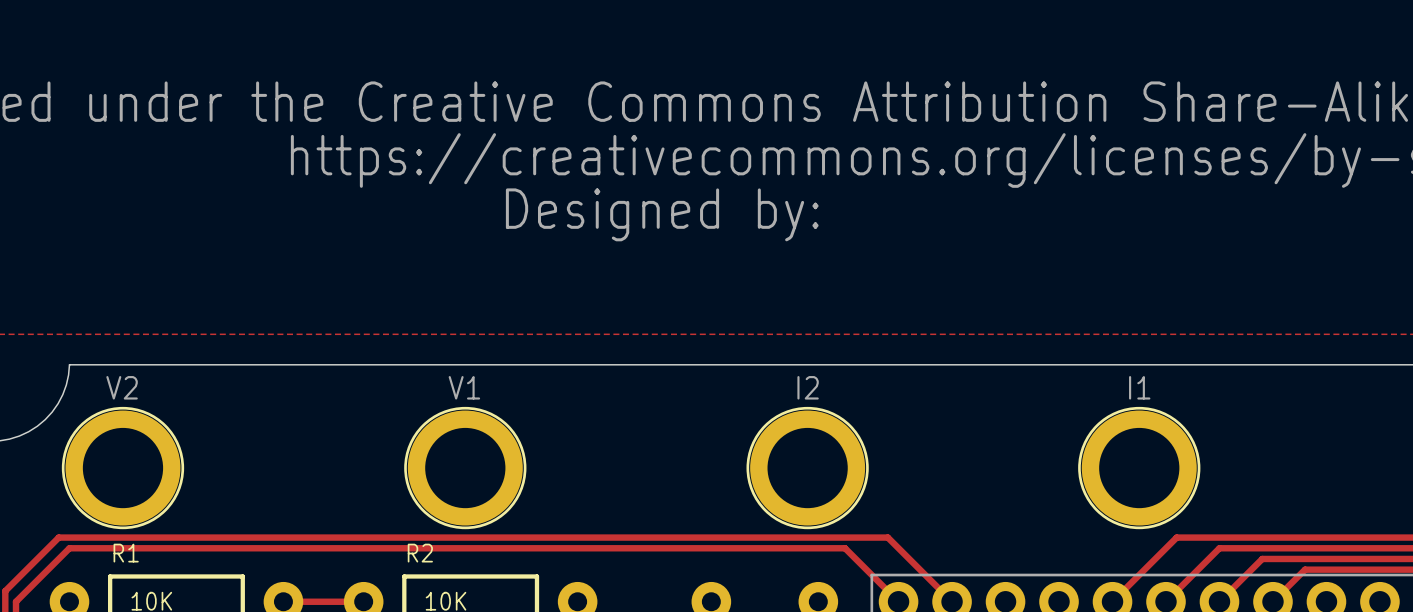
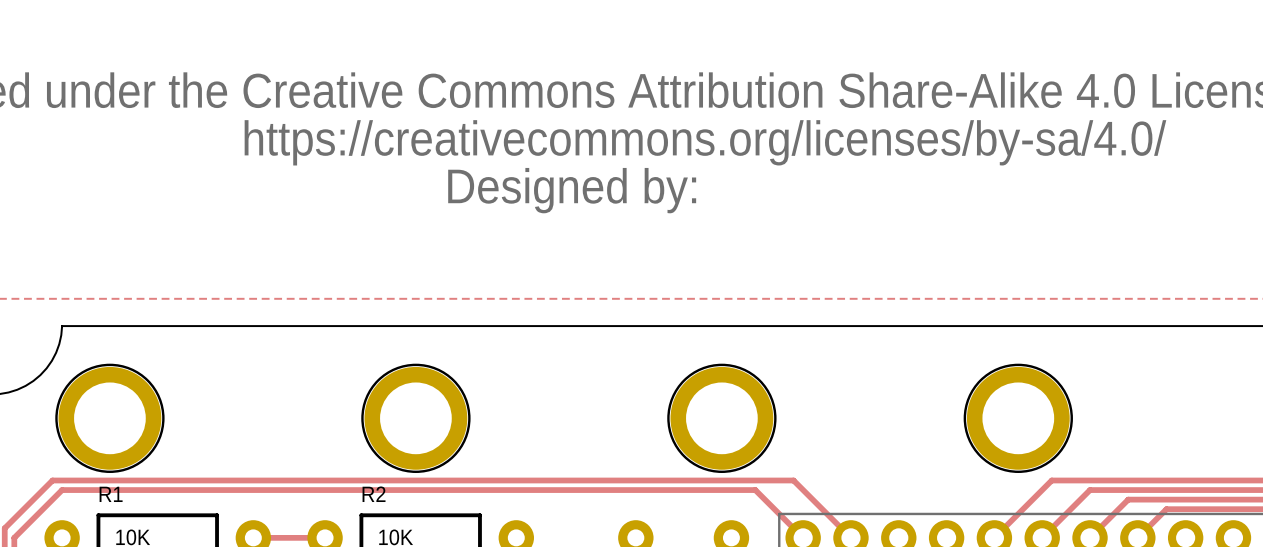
text: V2 (122, 387) -> none
text: V1 (464, 387) -> none
text: I2 (808, 387) -> none
text: I1 (1139, 387) -> none

